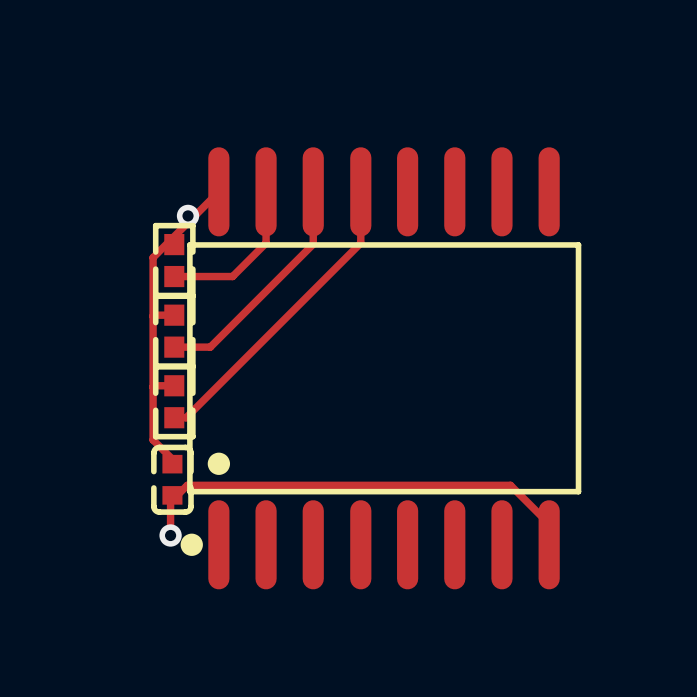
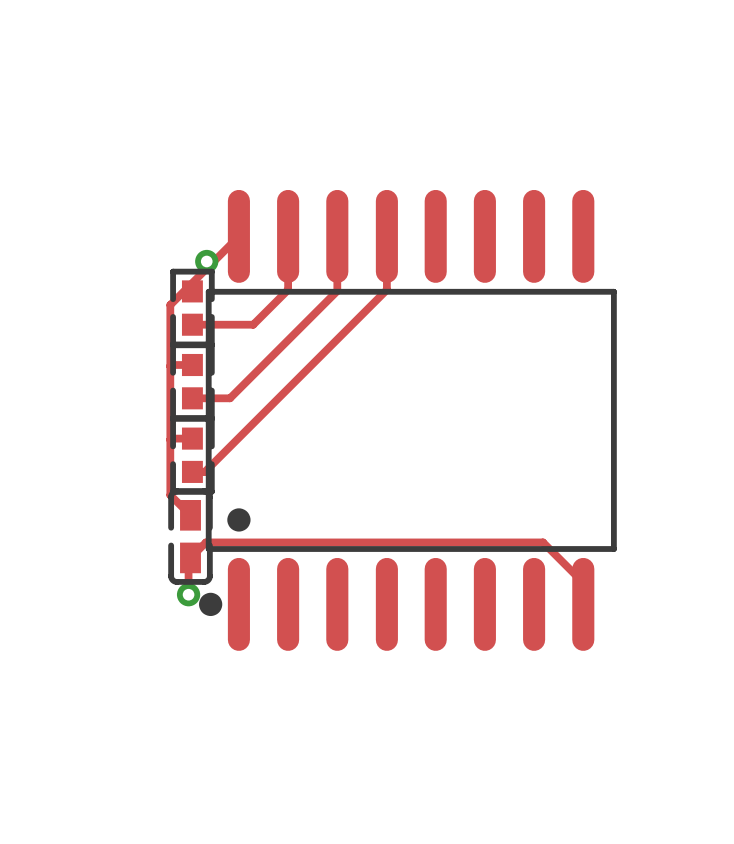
part footprint: [151, 444, 194, 515] -> [168, 488, 213, 585]

